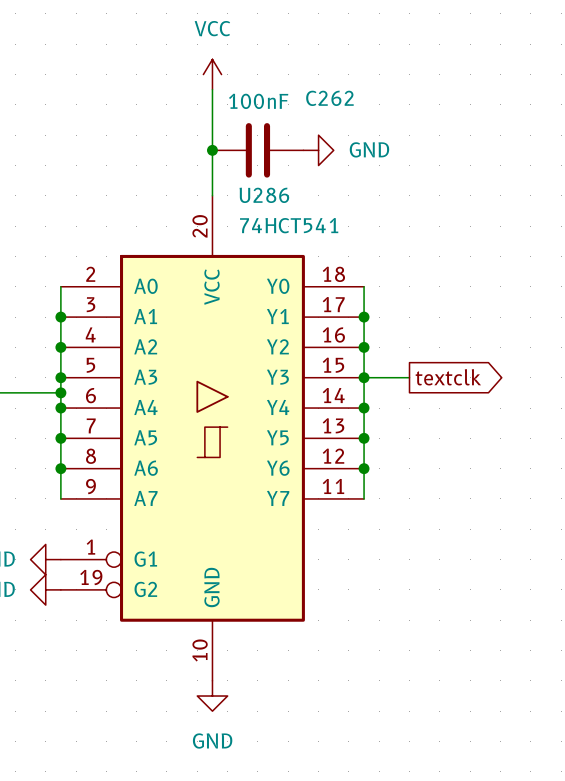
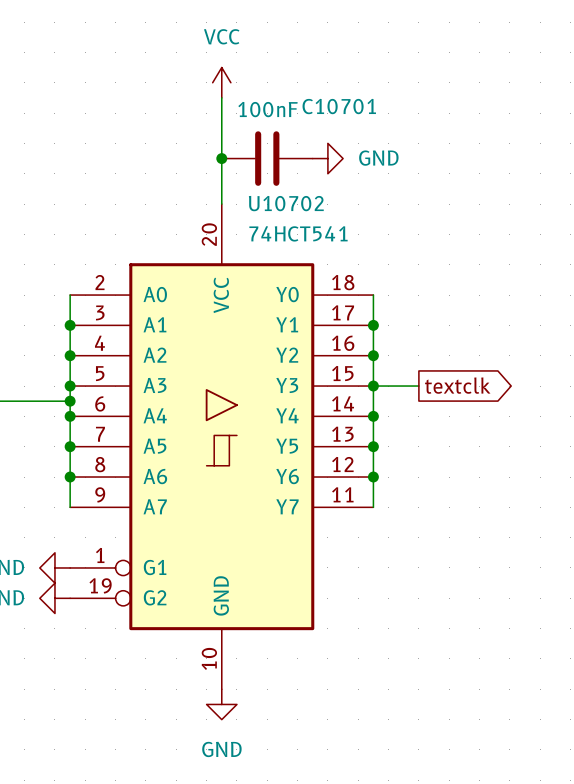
C262 name: C262 (329, 98) -> C10701 (339, 106)
U286 name: U286 (264, 195) -> U10702 (286, 203)

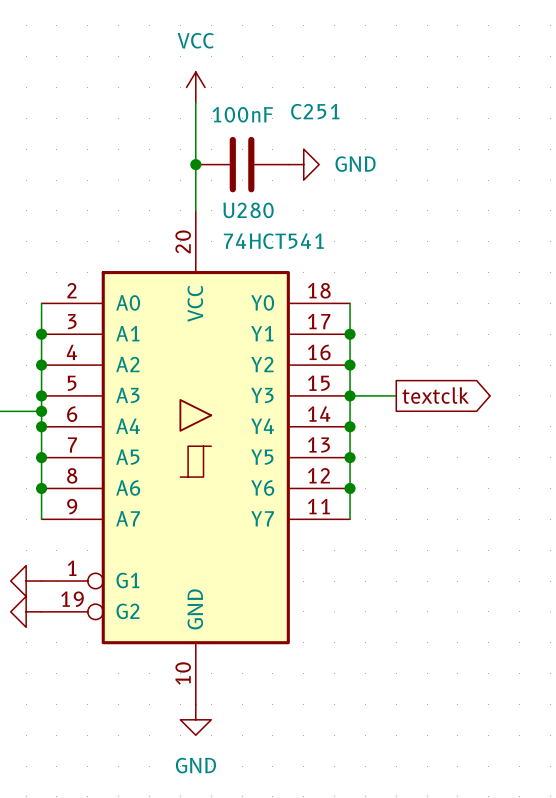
C10701 name: C10701 (339, 106) -> C251 (315, 111)
U10702 name: U10702 (286, 203) -> U280 (248, 210)

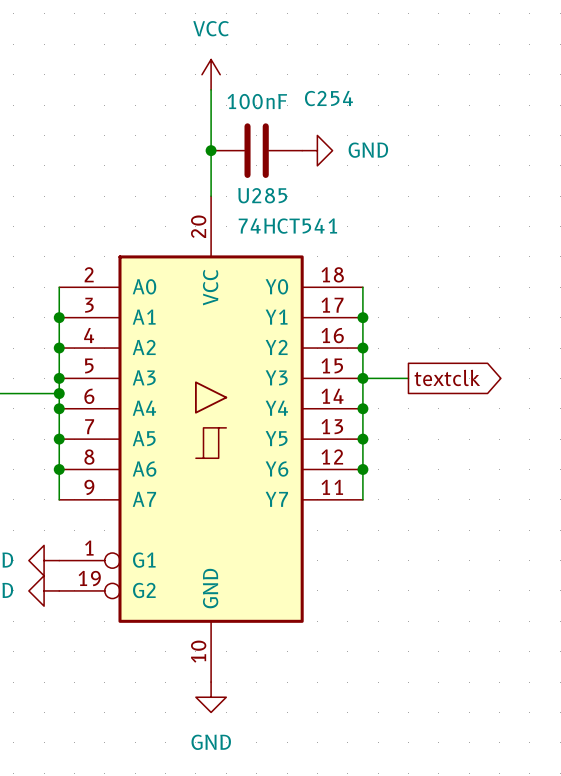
C251 name: C251 (315, 111) -> C254 (328, 98)
U280 name: U280 (248, 210) -> U285 (262, 195)

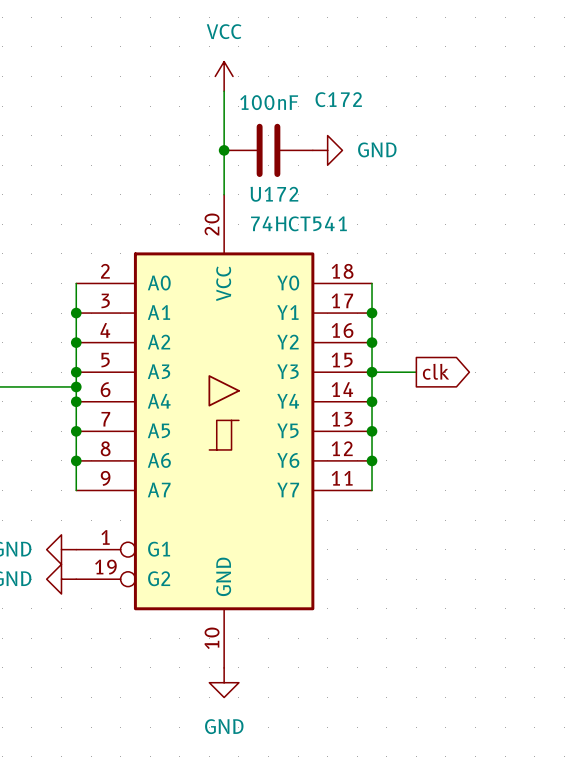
C254 name: C254 (328, 98) -> C172 (338, 99)
U285 name: U285 (262, 195) -> U172 (274, 194)
global label: textclk (447, 377) -> clk (436, 371)

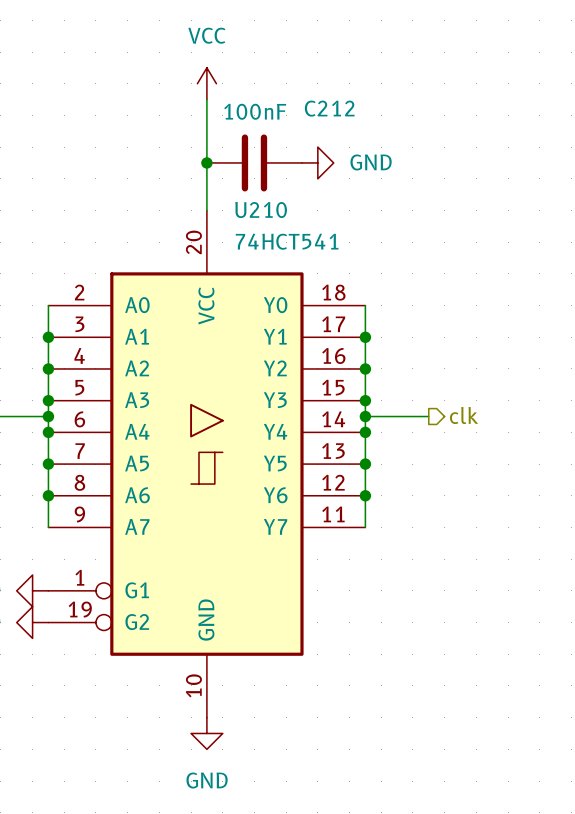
C172 name: C172 (338, 99) -> C212 (329, 108)
U172 name: U172 (274, 194) -> U210 (261, 210)
global label: clk (436, 371) -> none
wire: (372, 372) (416, 372) -> none
wire: none -> (365, 416) (428, 416)
junction: none -> (365, 416)
hierarchical label: none -> clk (464, 415)

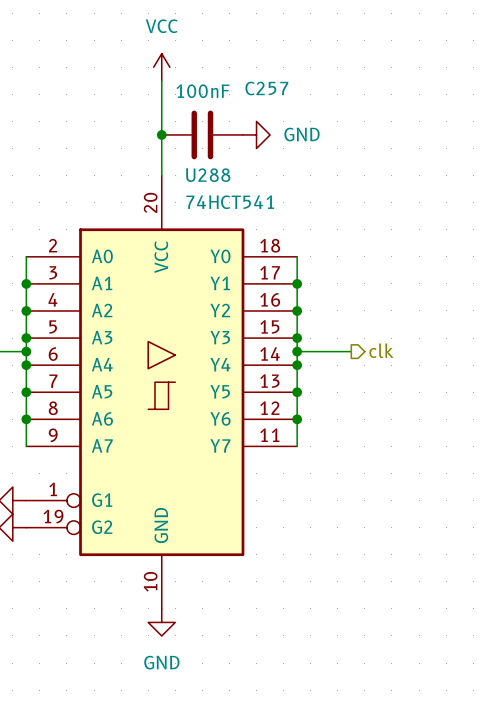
C212 name: C212 (329, 108) -> C257 (266, 88)
U210 name: U210 (261, 210) -> U288 (208, 175)

